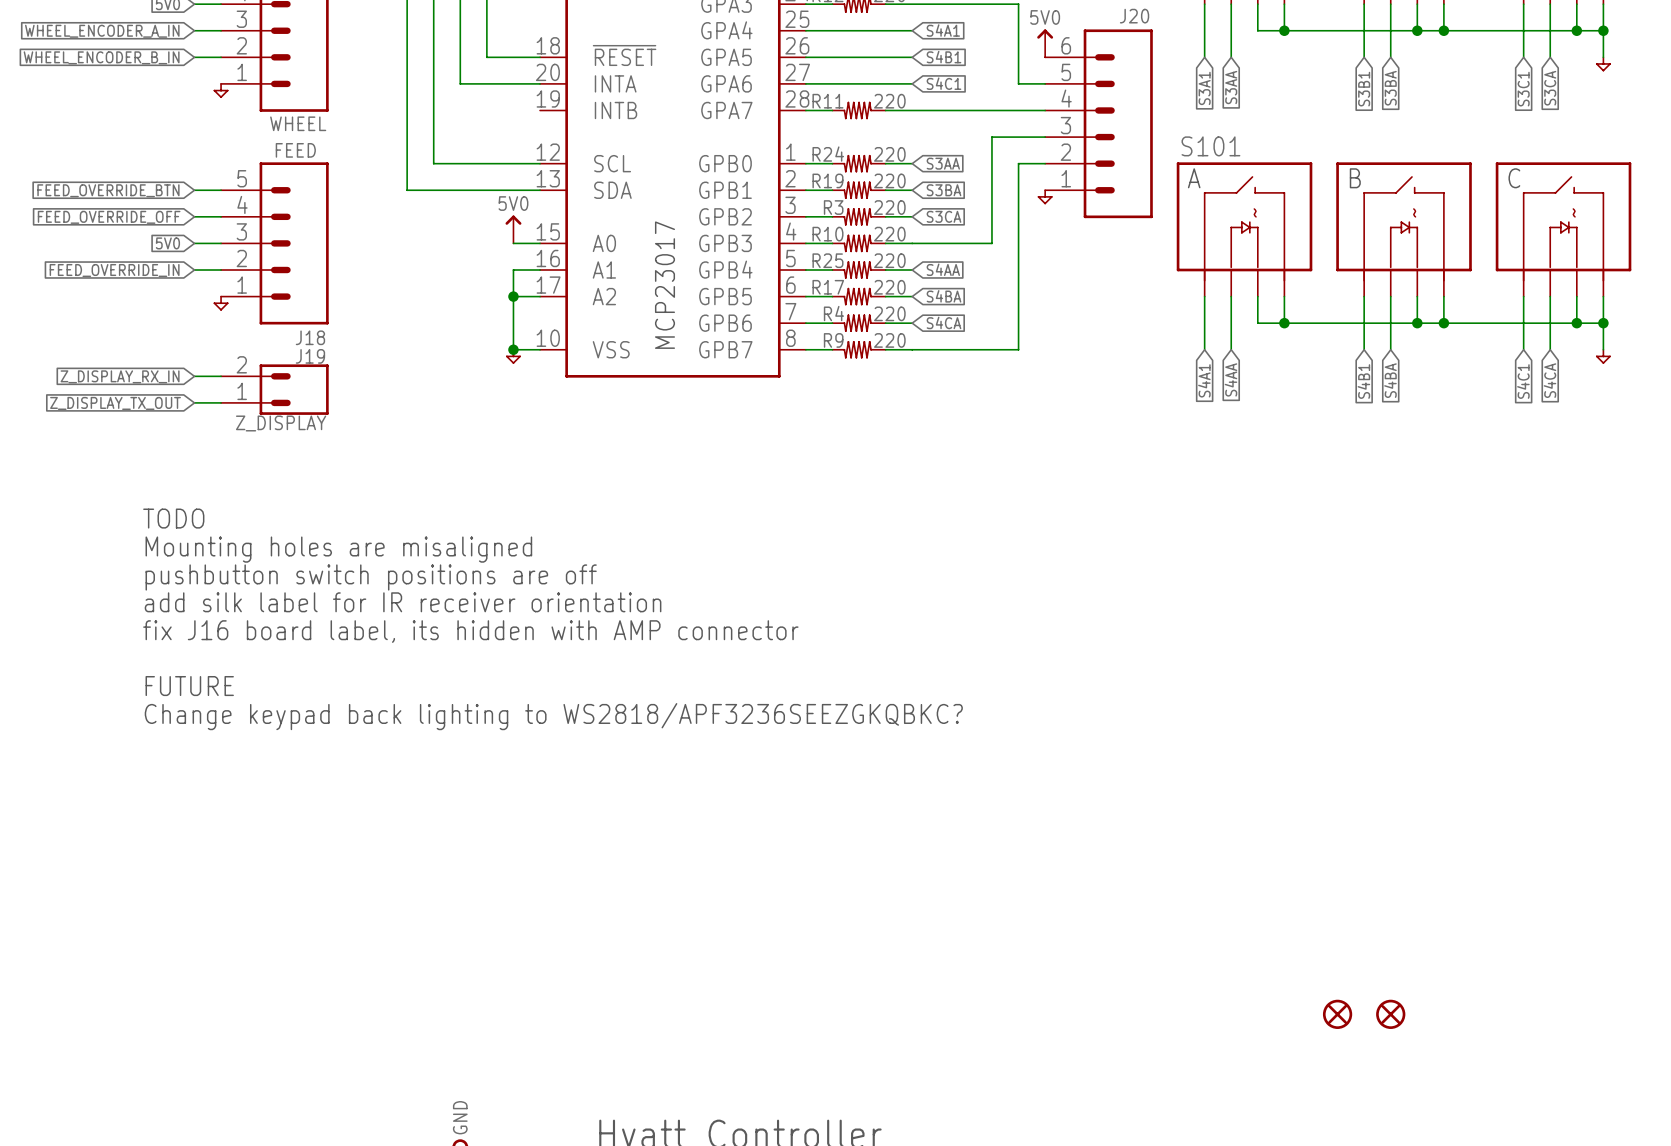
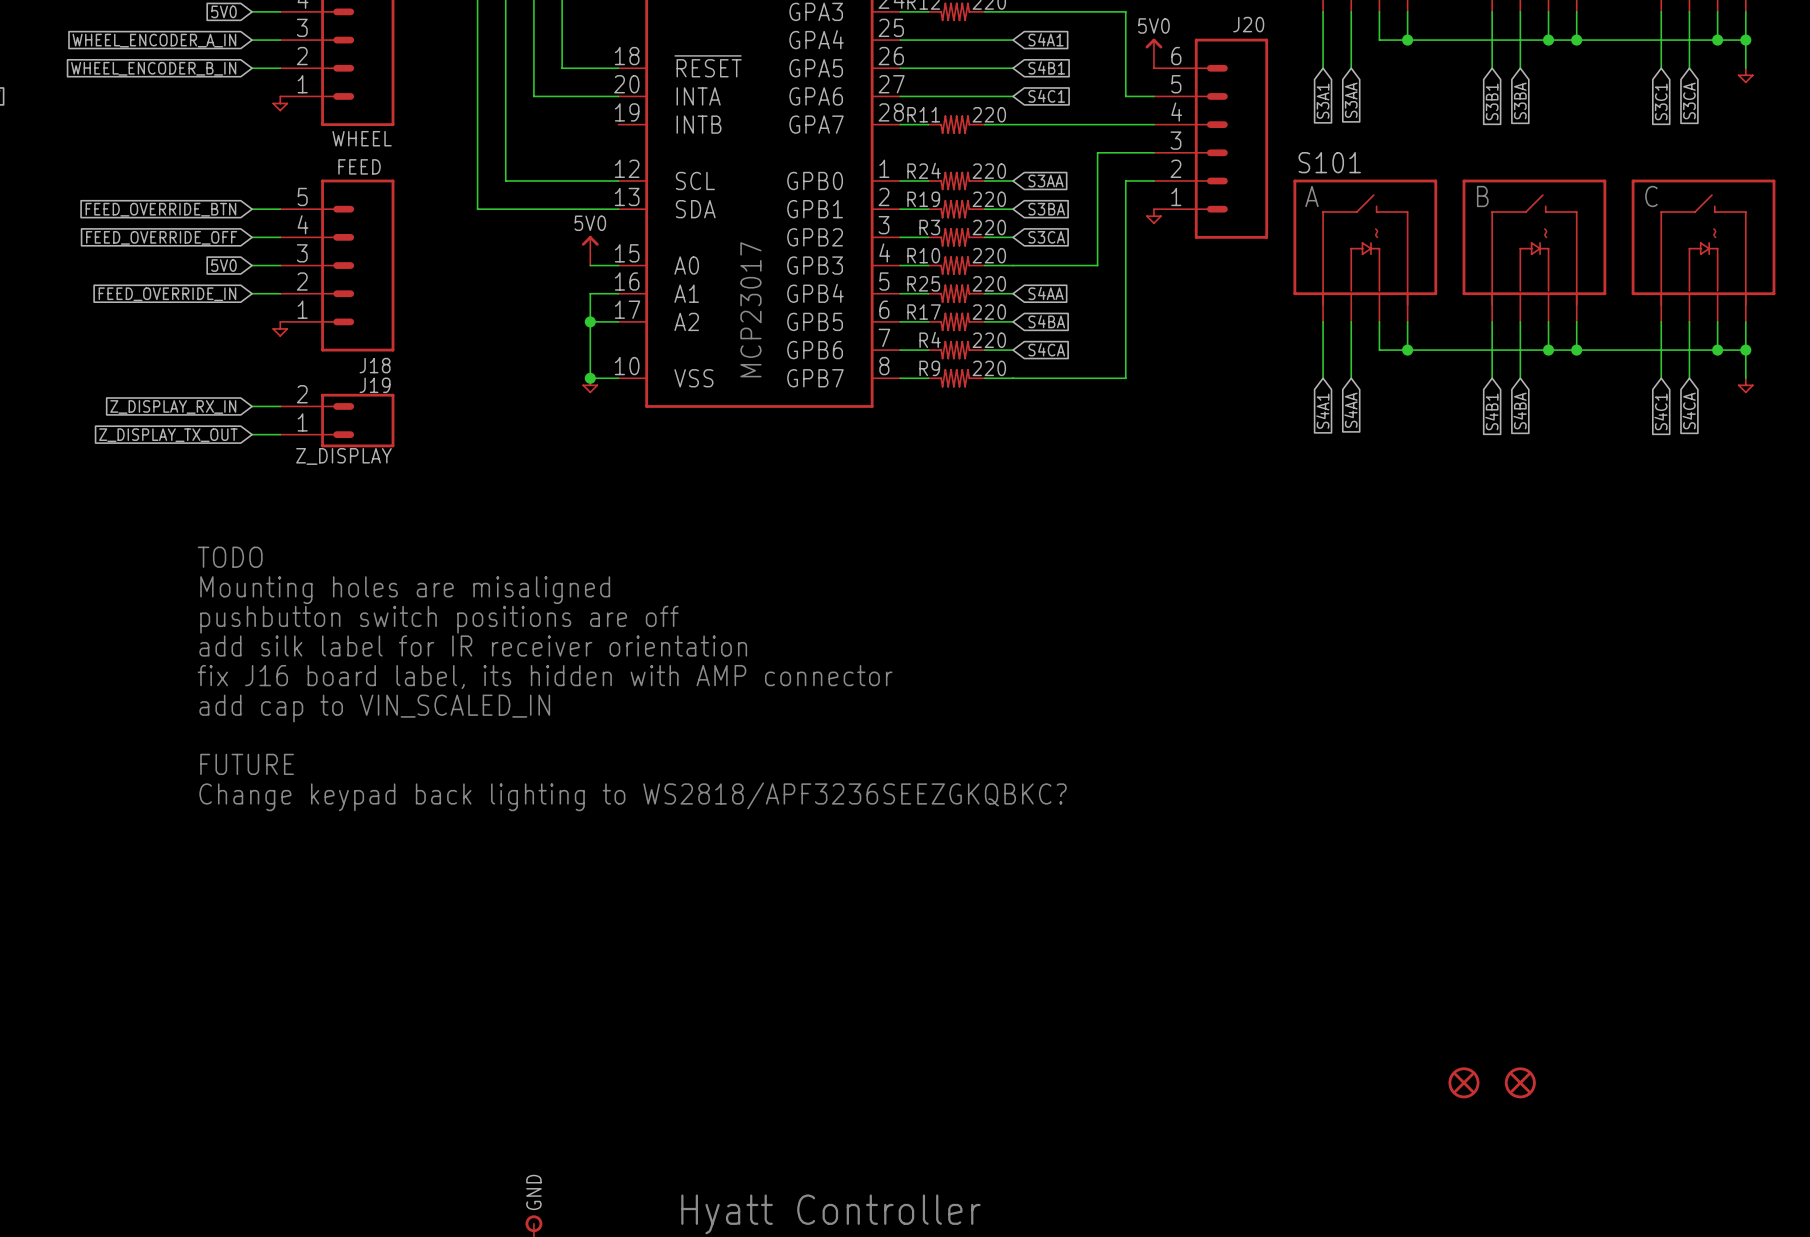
text: none -> add cap to VIN_SCALED_IN (374, 708)
text: FUTURE (189, 686) -> none
text: Change keypad back lighting to WS2818/APF3236SEEZGKQBKC? (553, 716) -> FUTURE (247, 764)
text: none -> Change keypad back lighting to WS2818/APF3236SEEZGKQBKC? (633, 796)

